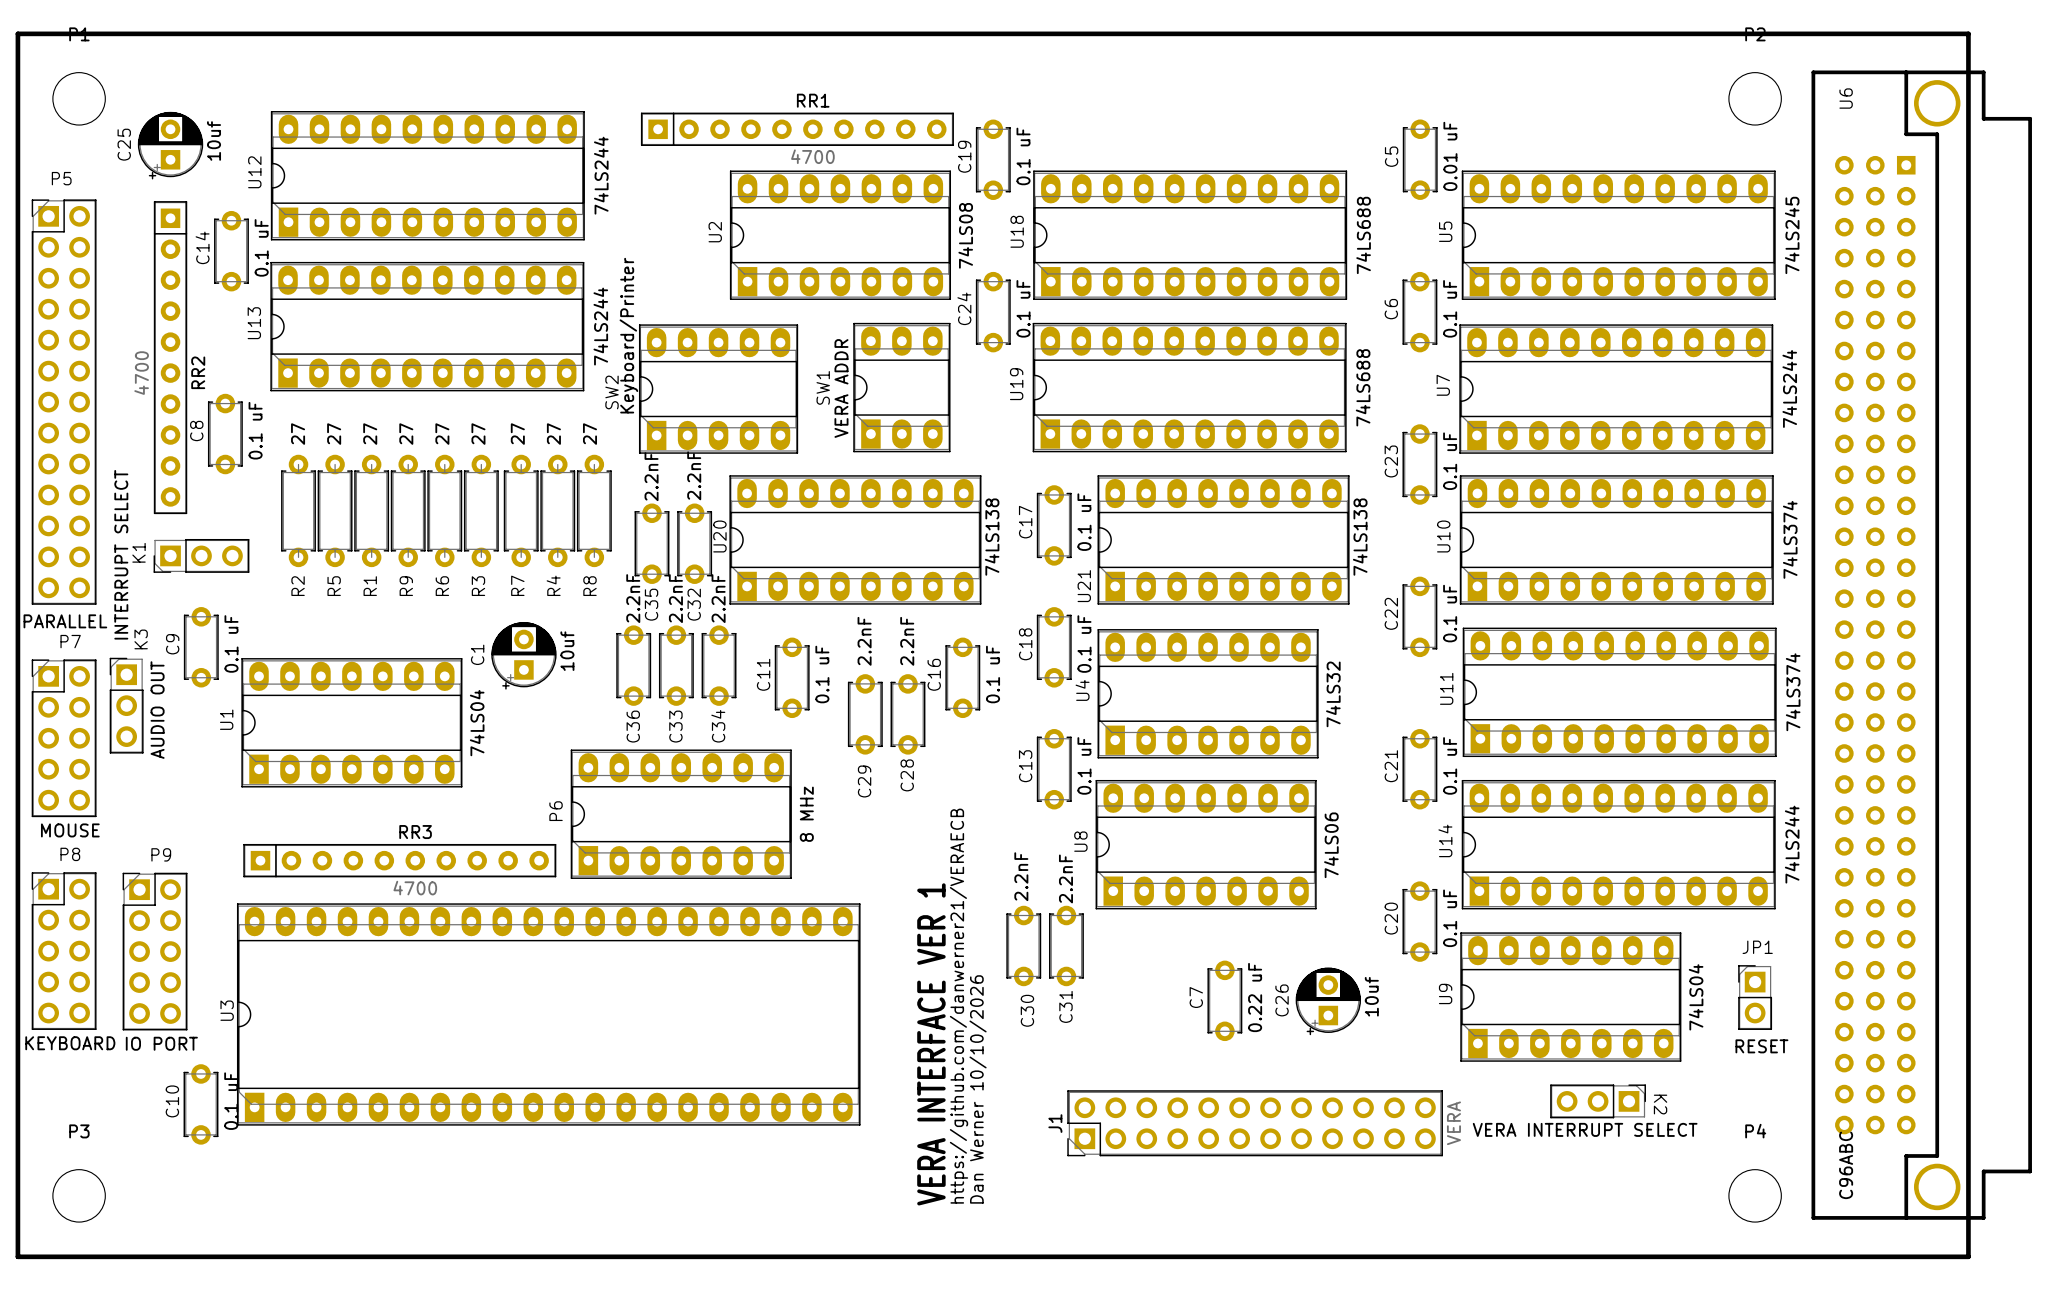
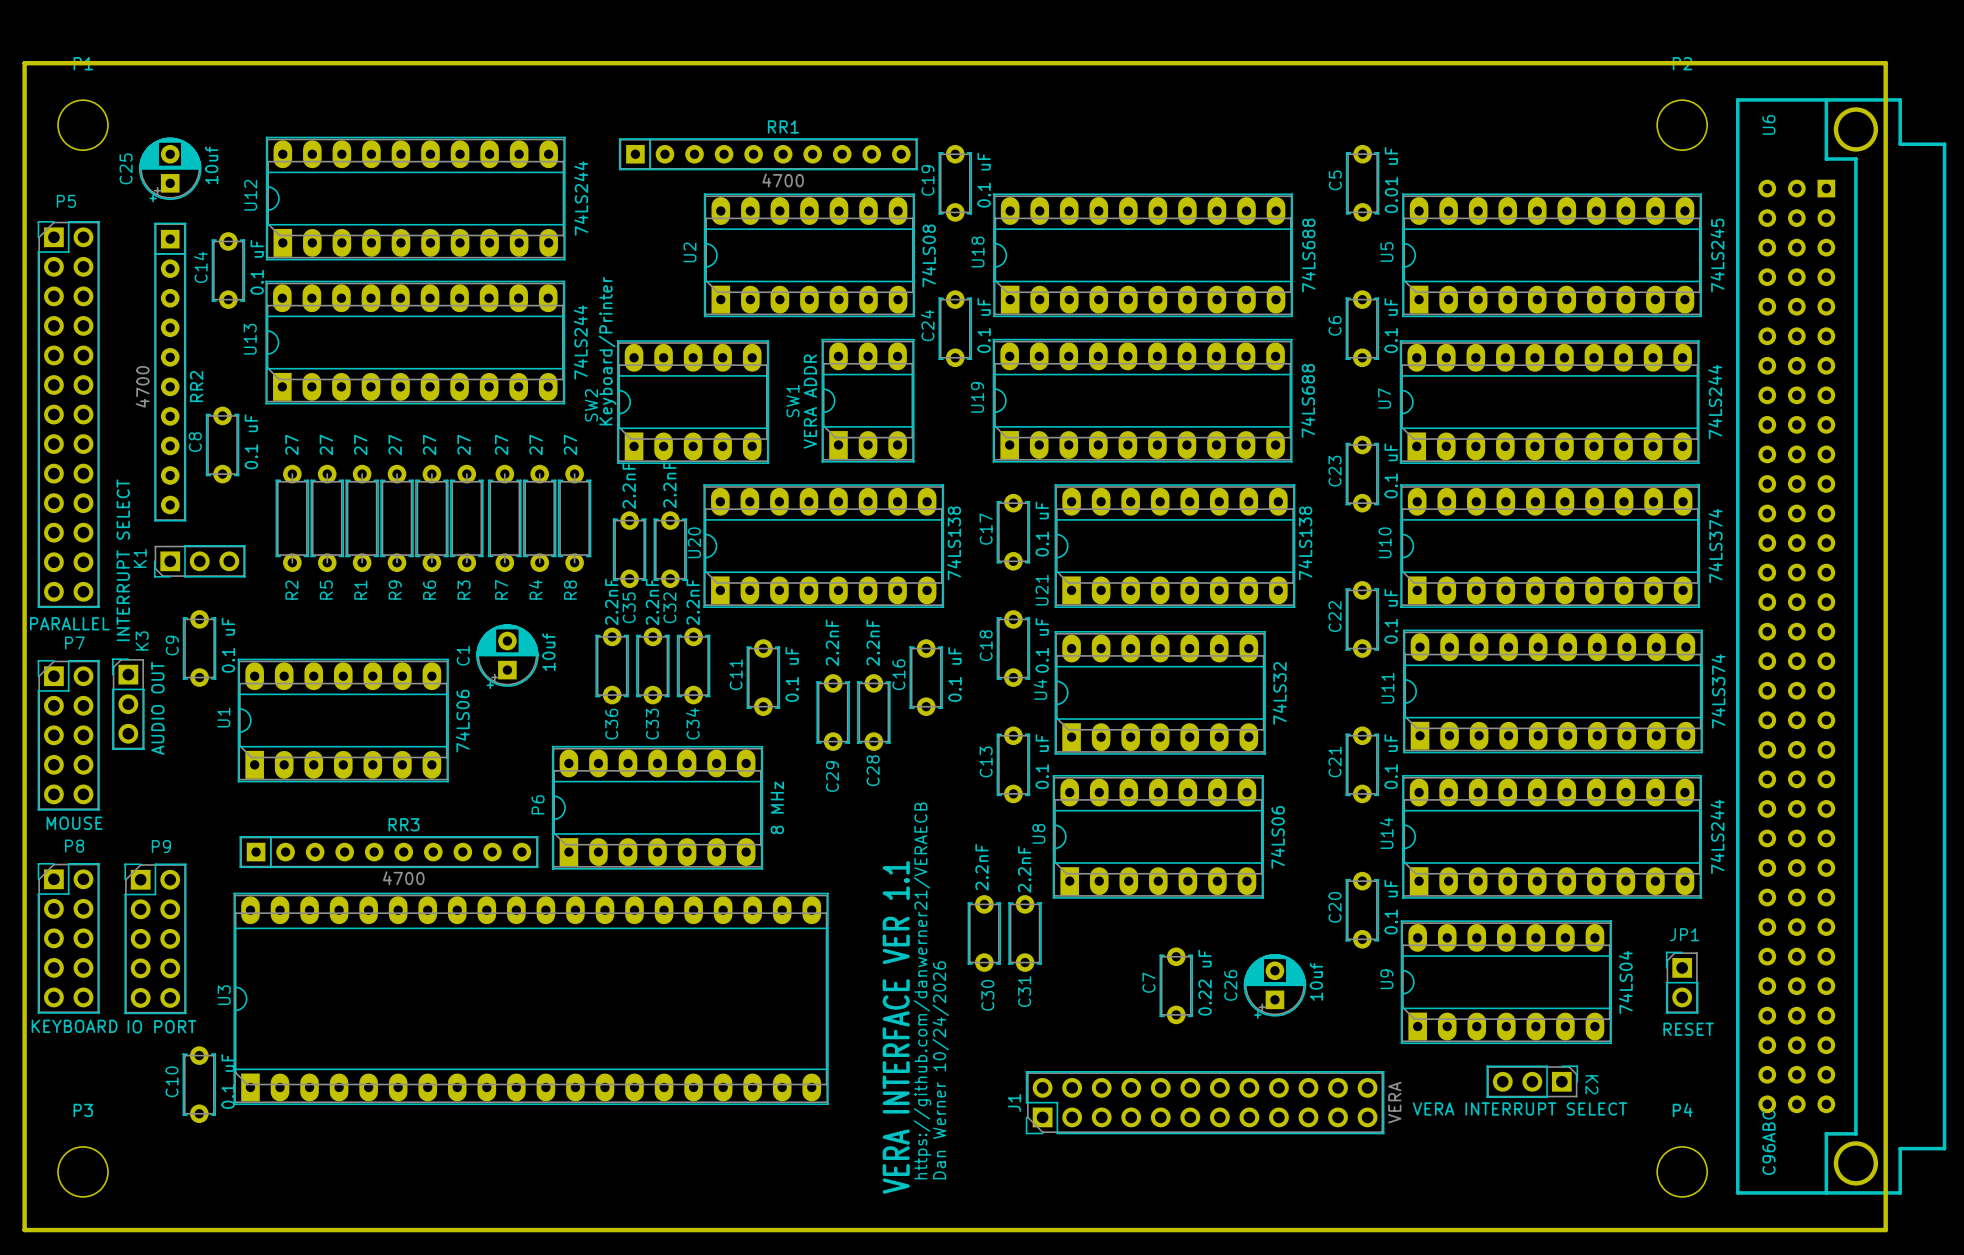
U1 value: 74LS04 (477, 723) -> 74LS06 (462, 721)
text: VERA INTERFACE VER 1 (931, 1044) -> VERA INTERFACE VER 1.1 (896, 1027)
text: Dan Werner 10/10/2026 (978, 1089) -> Dan Werner 10/24/2026 (940, 1070)

